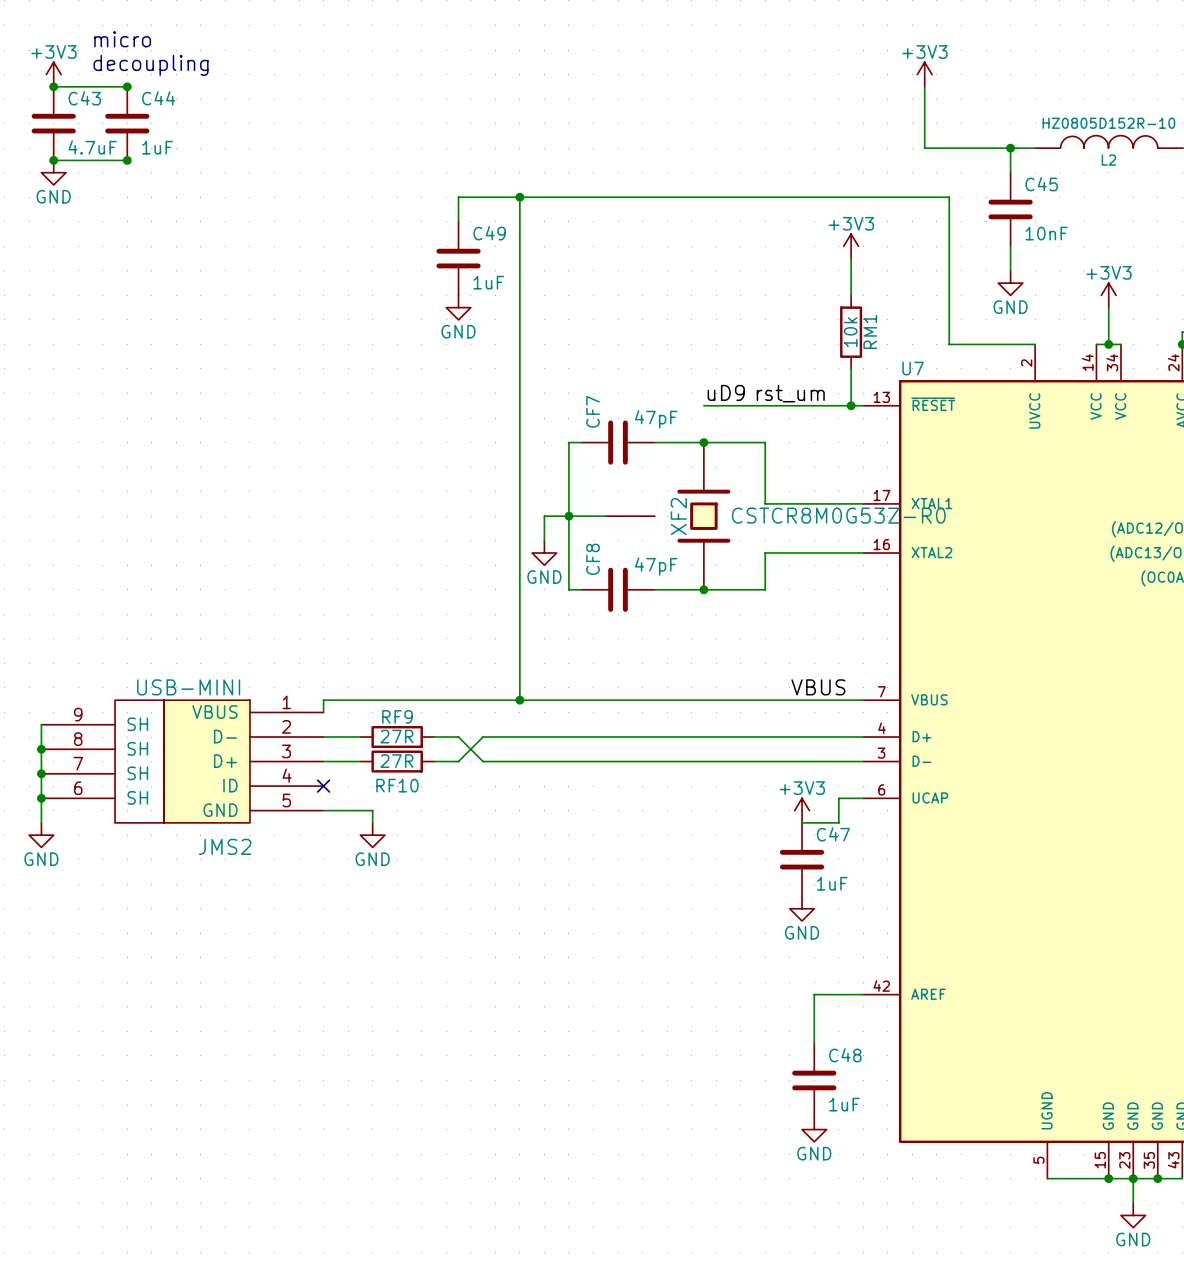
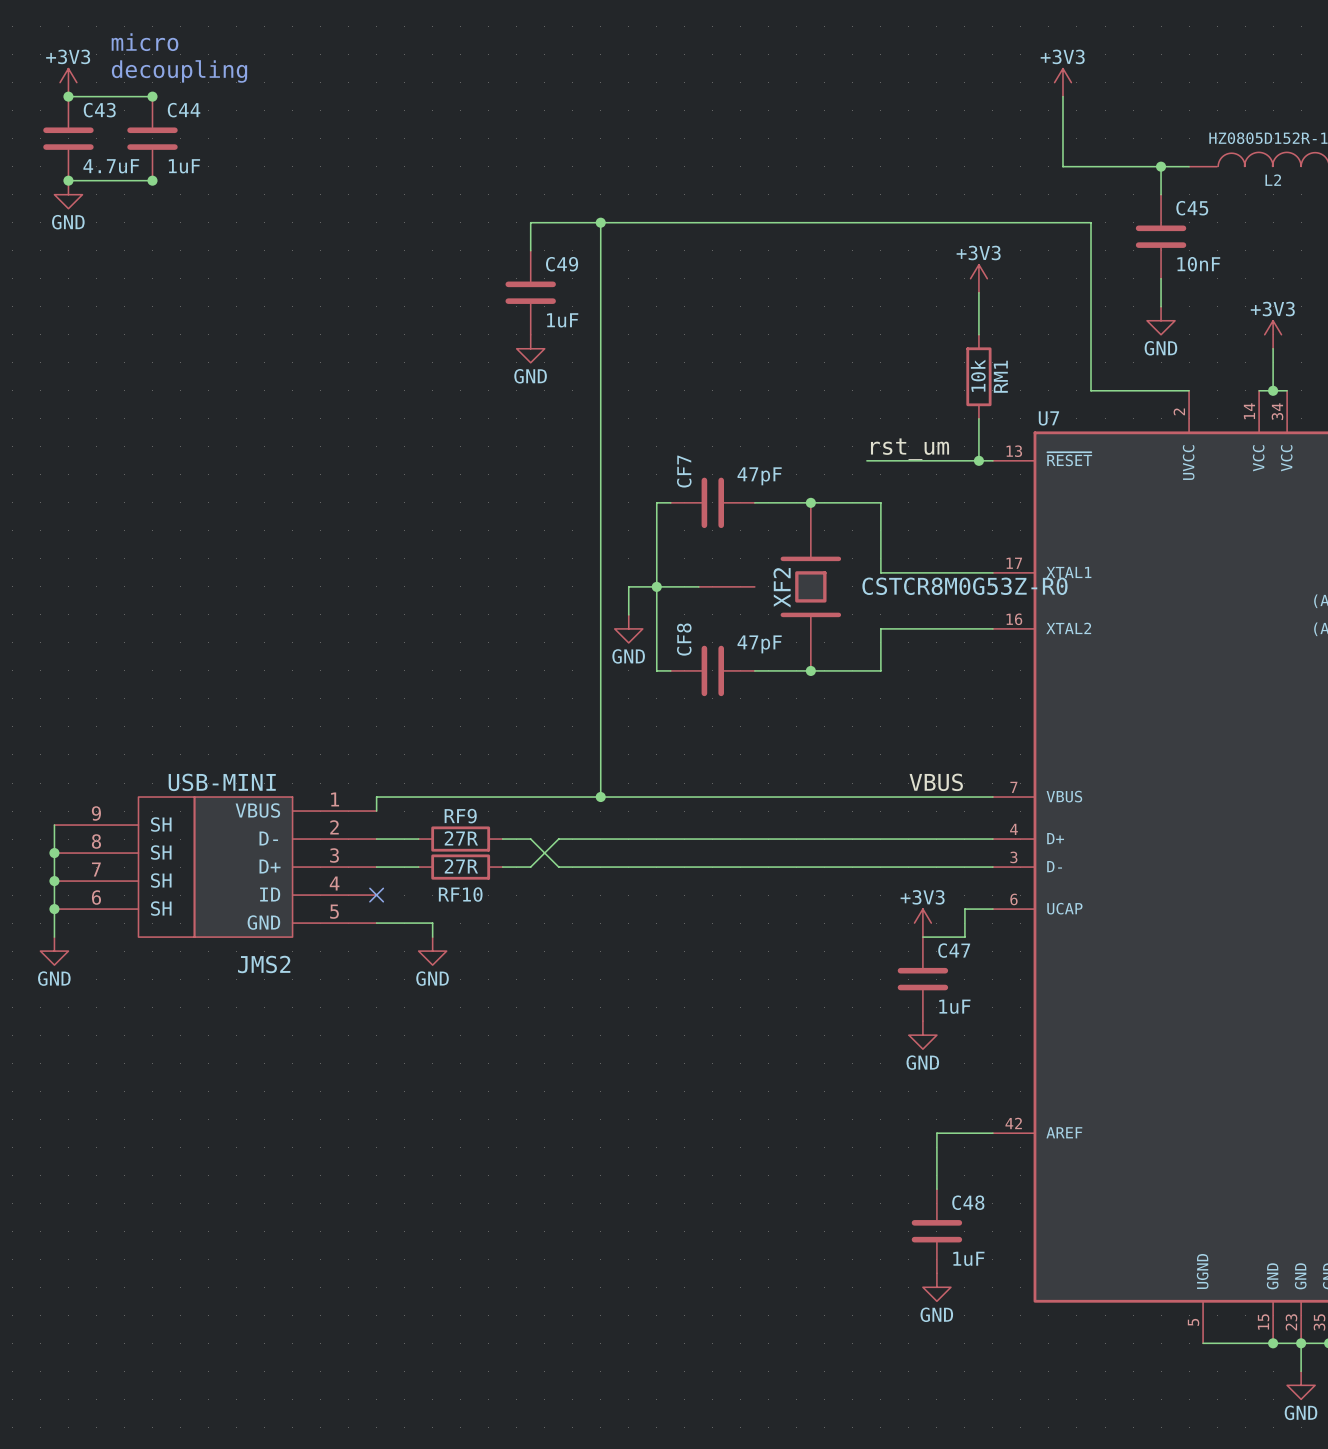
label: uD9 (726, 392) -> none
wire: (703, 405) (752, 405) -> none

